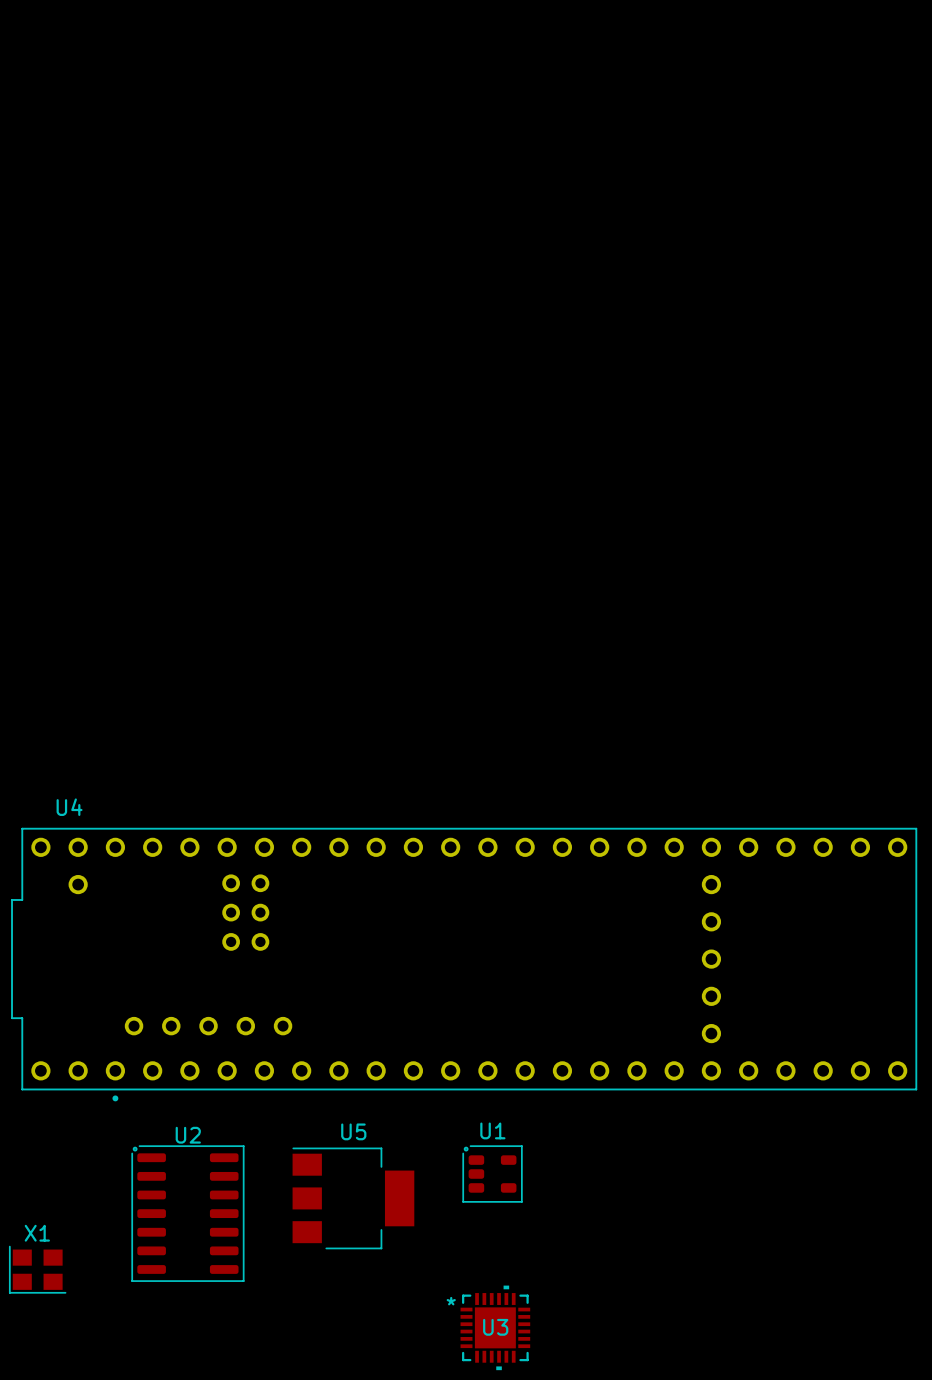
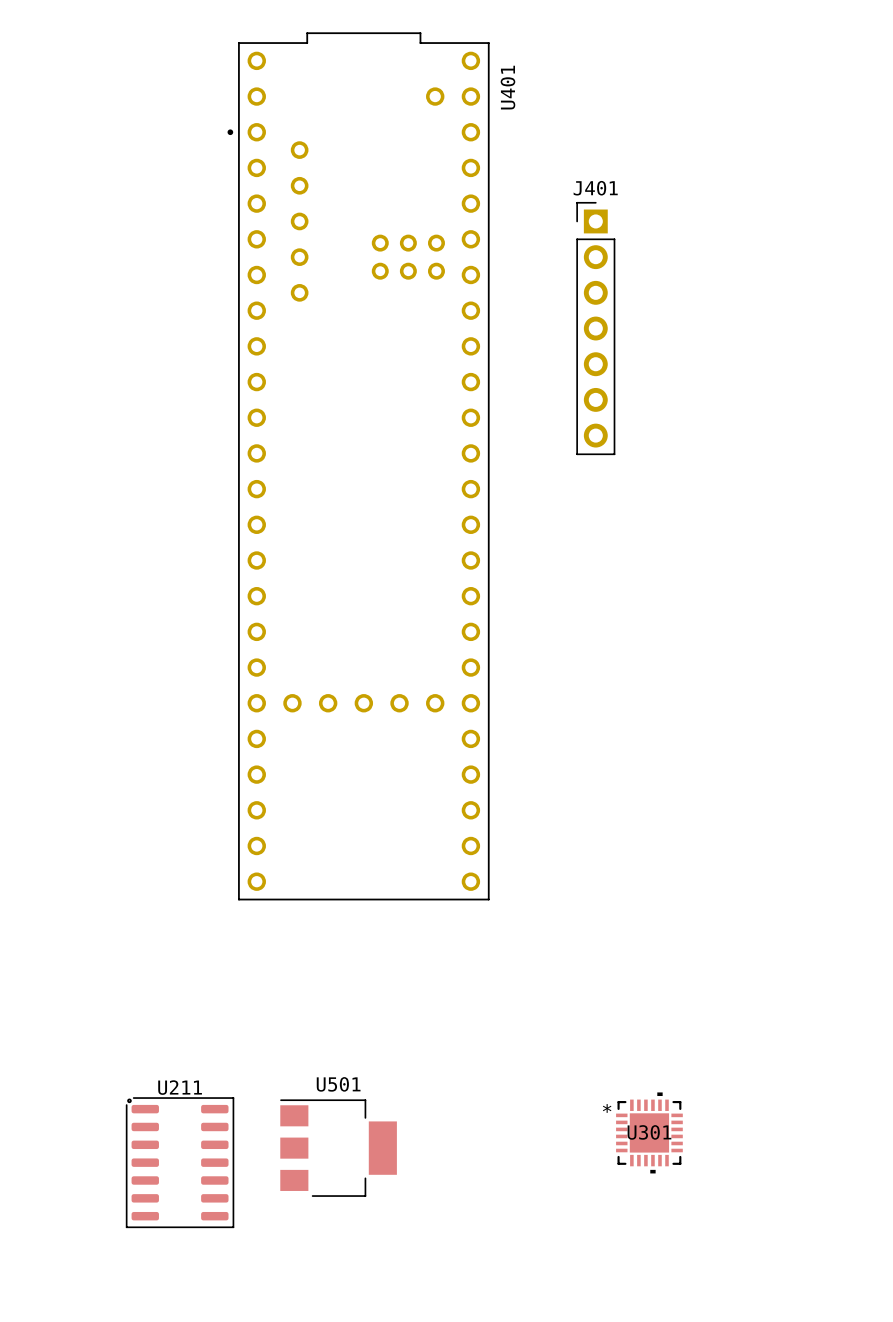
J401: none -> (595, 328)
U401: none -> (358, 466)
U4: (464, 964) -> none
U5 name: U5 (353, 1131) -> U501 (338, 1084)
U2 name: U2 (188, 1135) -> U211 (180, 1087)
U1: (492, 1174) -> none
U301: none -> (649, 1132)
X1: (37, 1269) -> none
U3: (495, 1327) -> none

